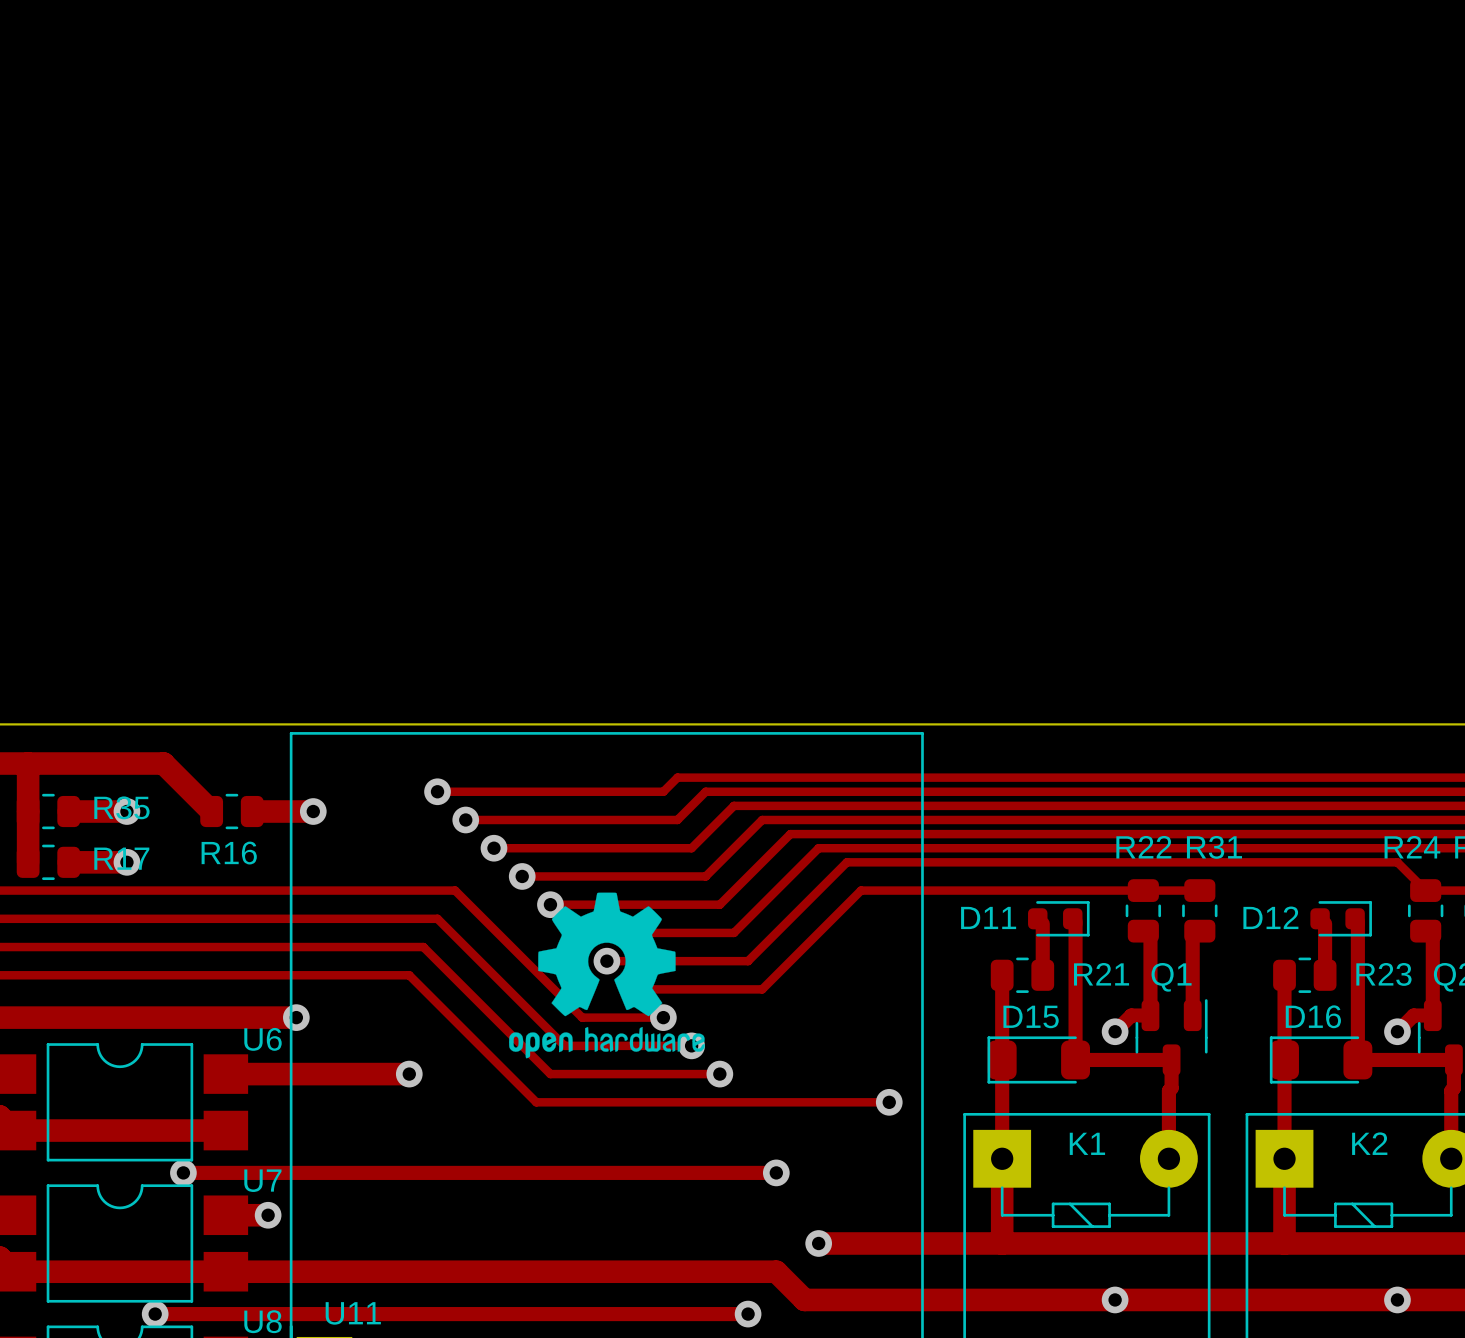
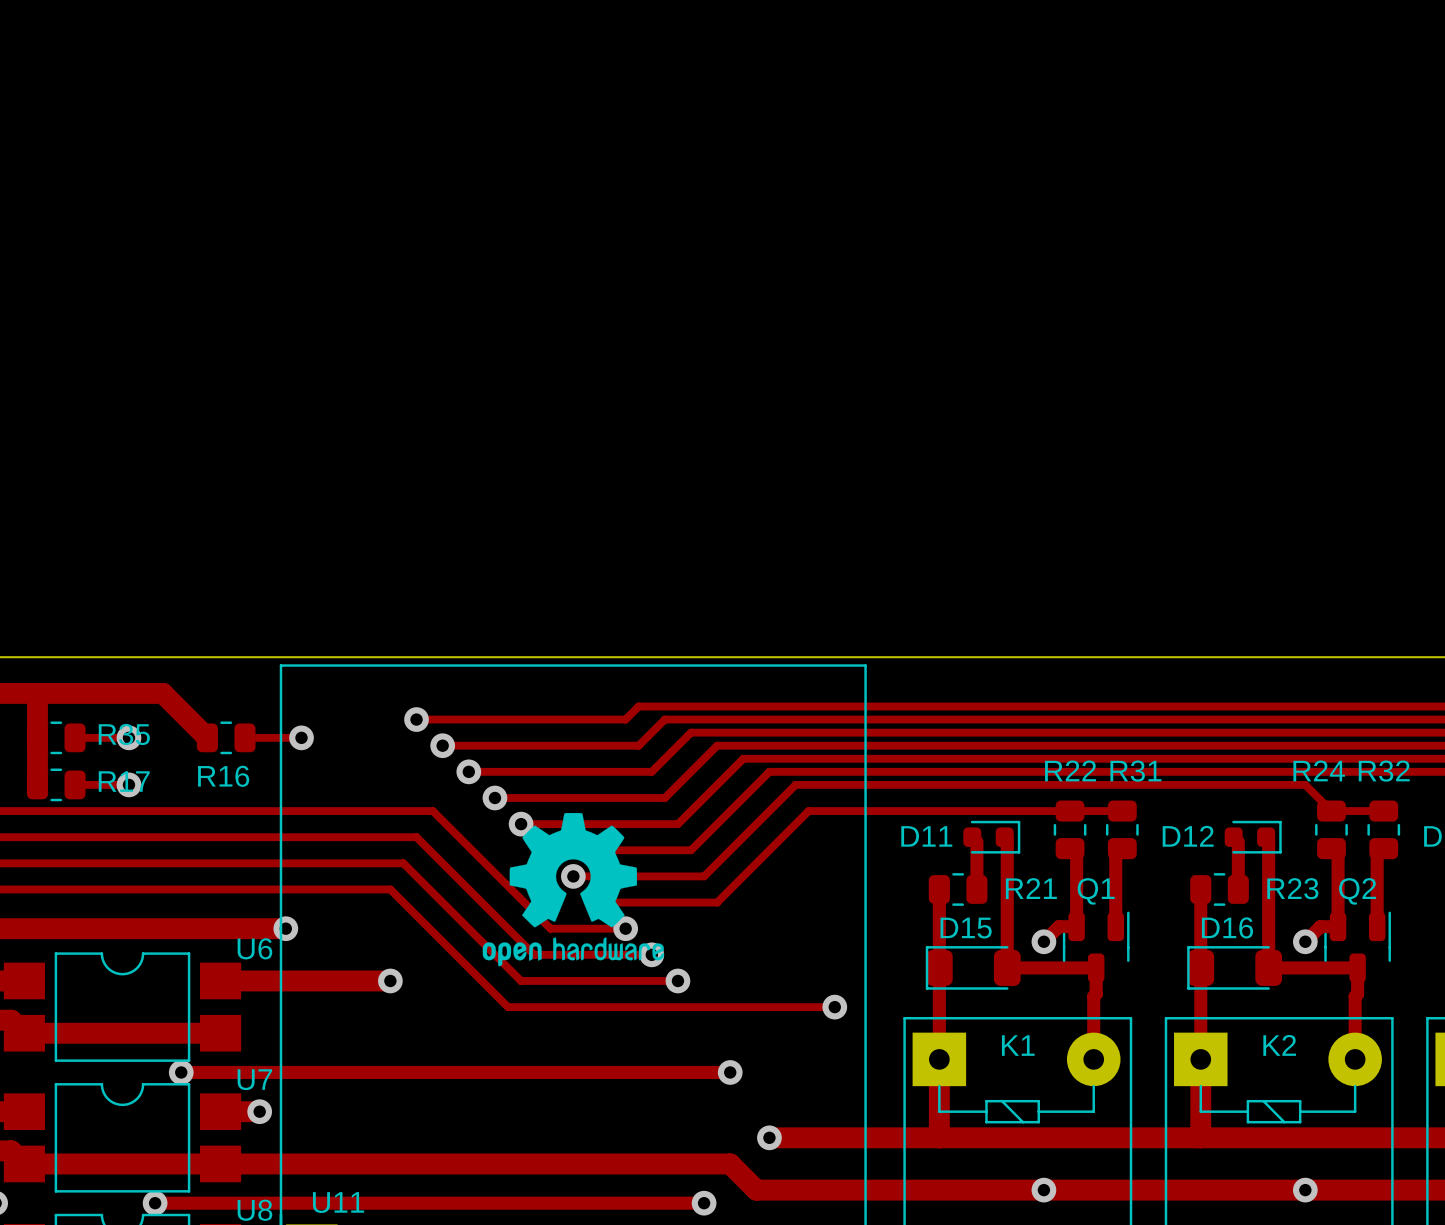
track width: thick (68, 811) (126, 811) -> thin (75, 737) (128, 737)
track width: thick (252, 811) (313, 811) -> thin (244, 737) (301, 737)
track width: thick (68, 862) (126, 862) -> thin (75, 784) (128, 784)

